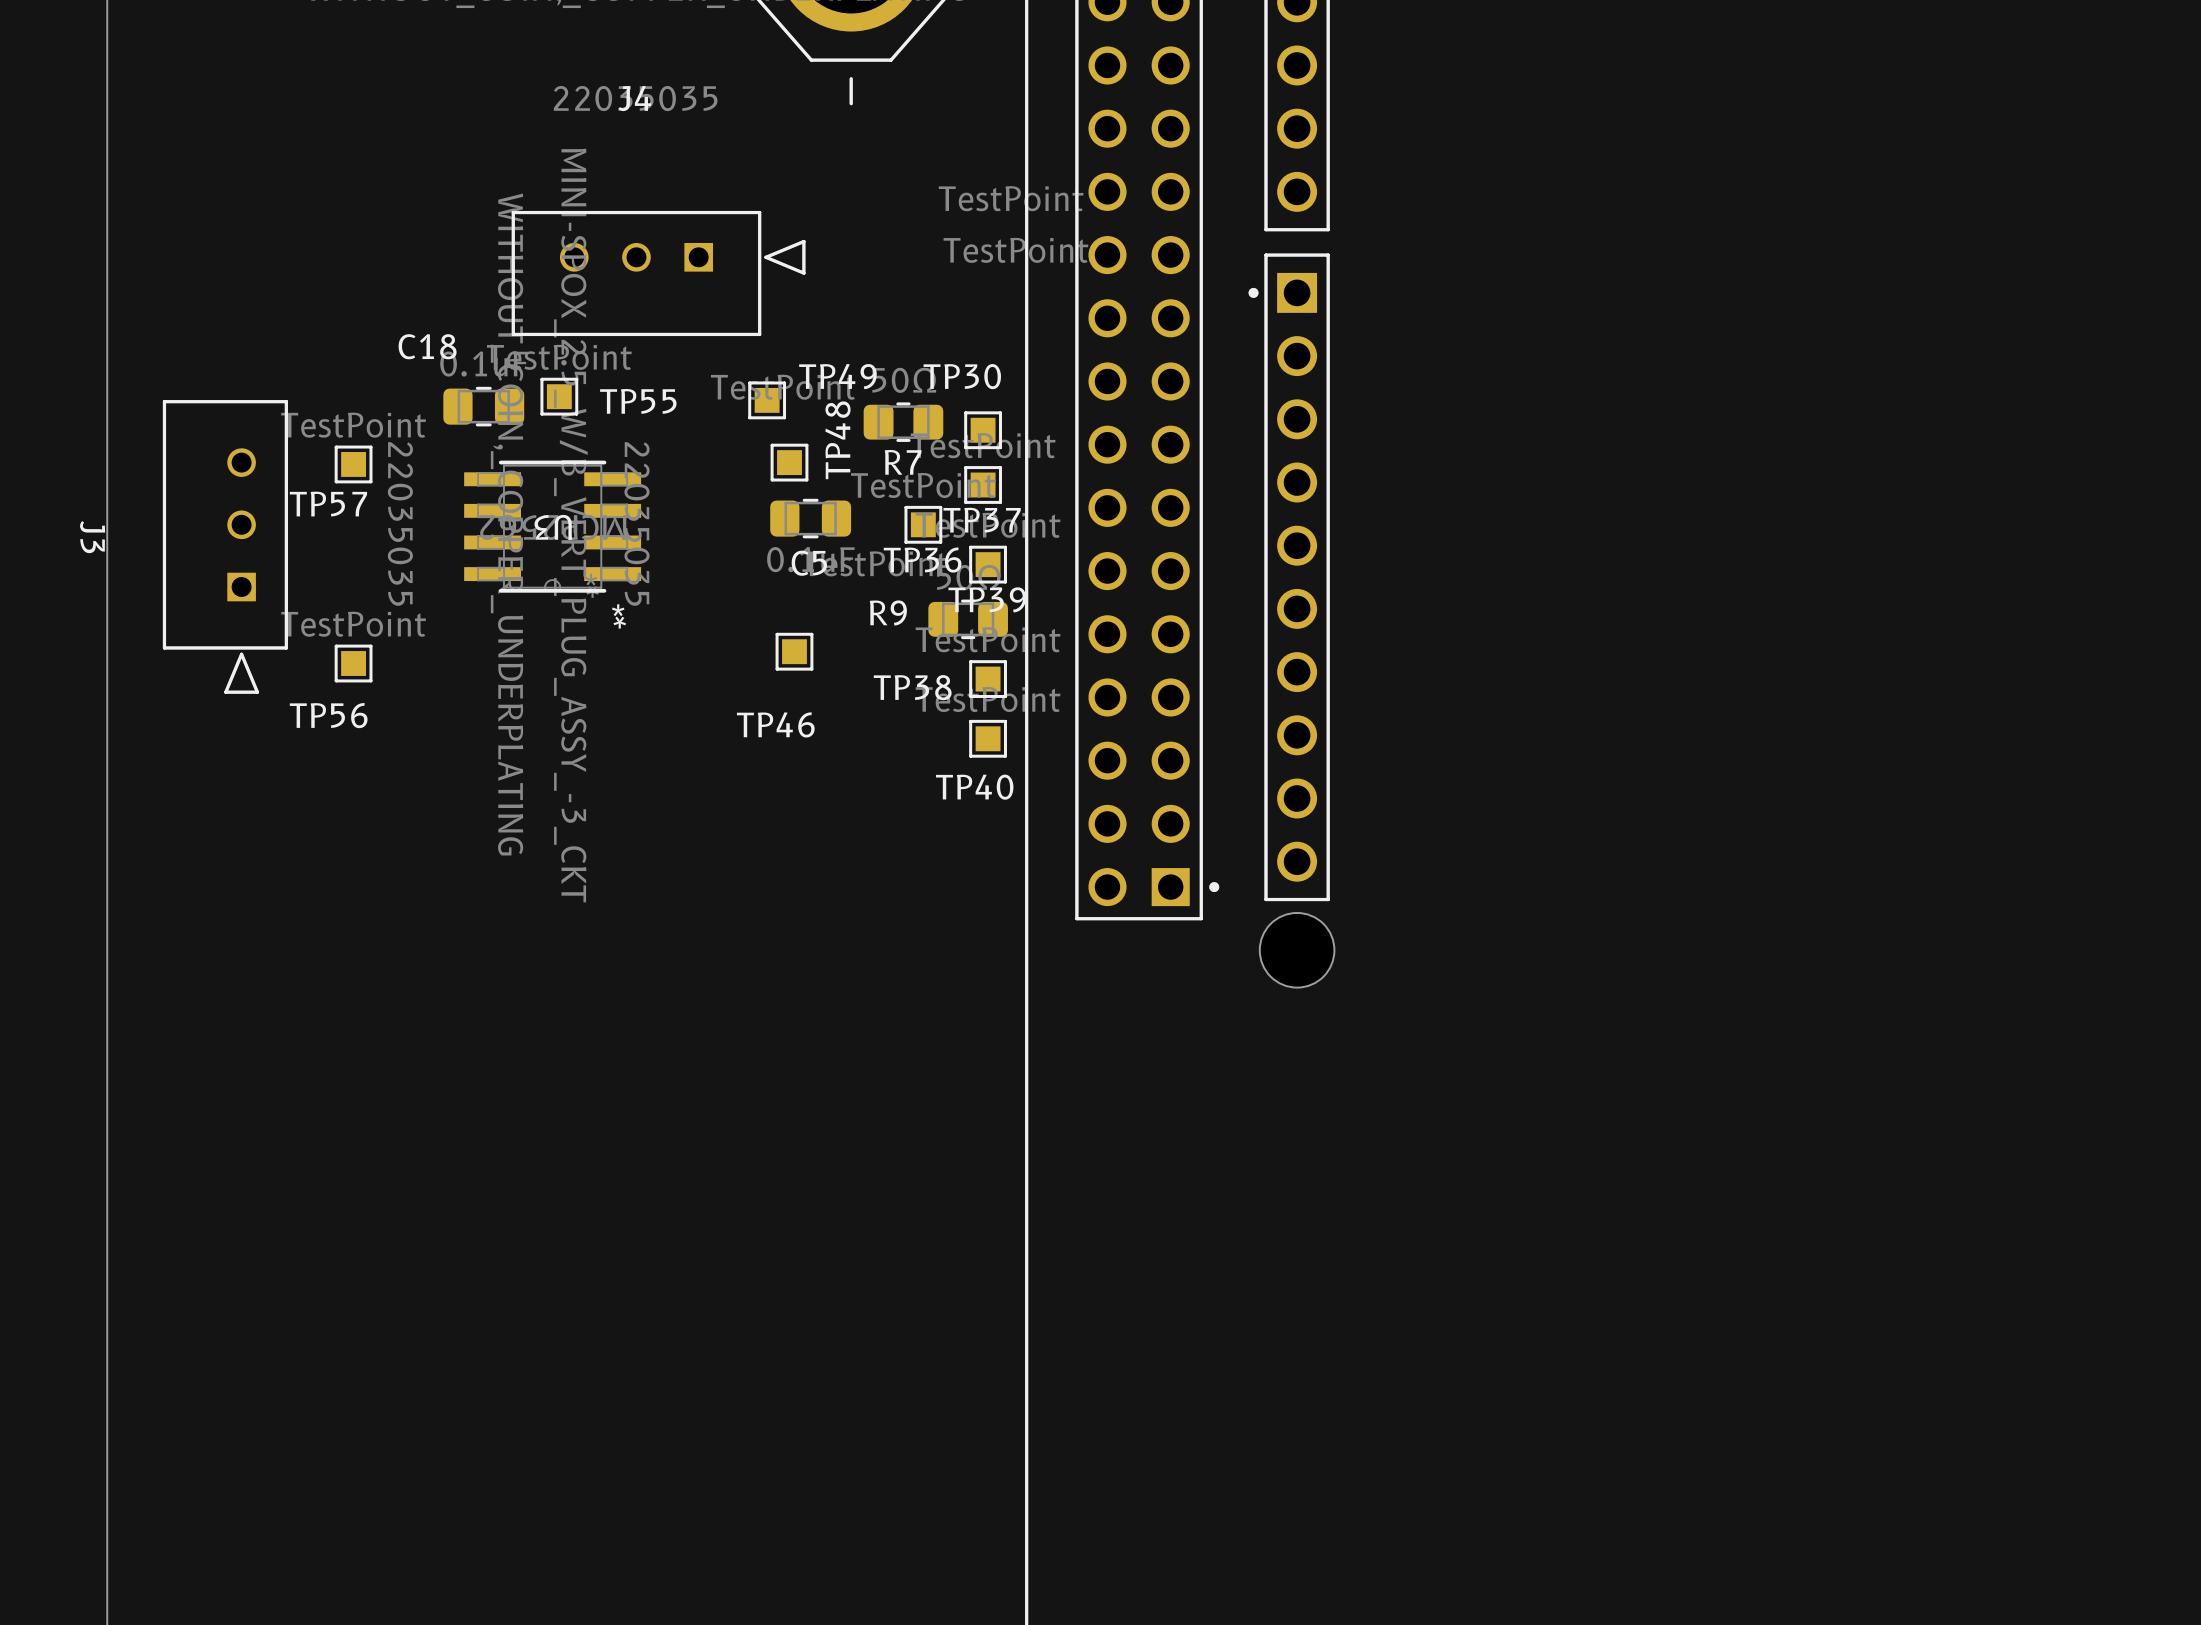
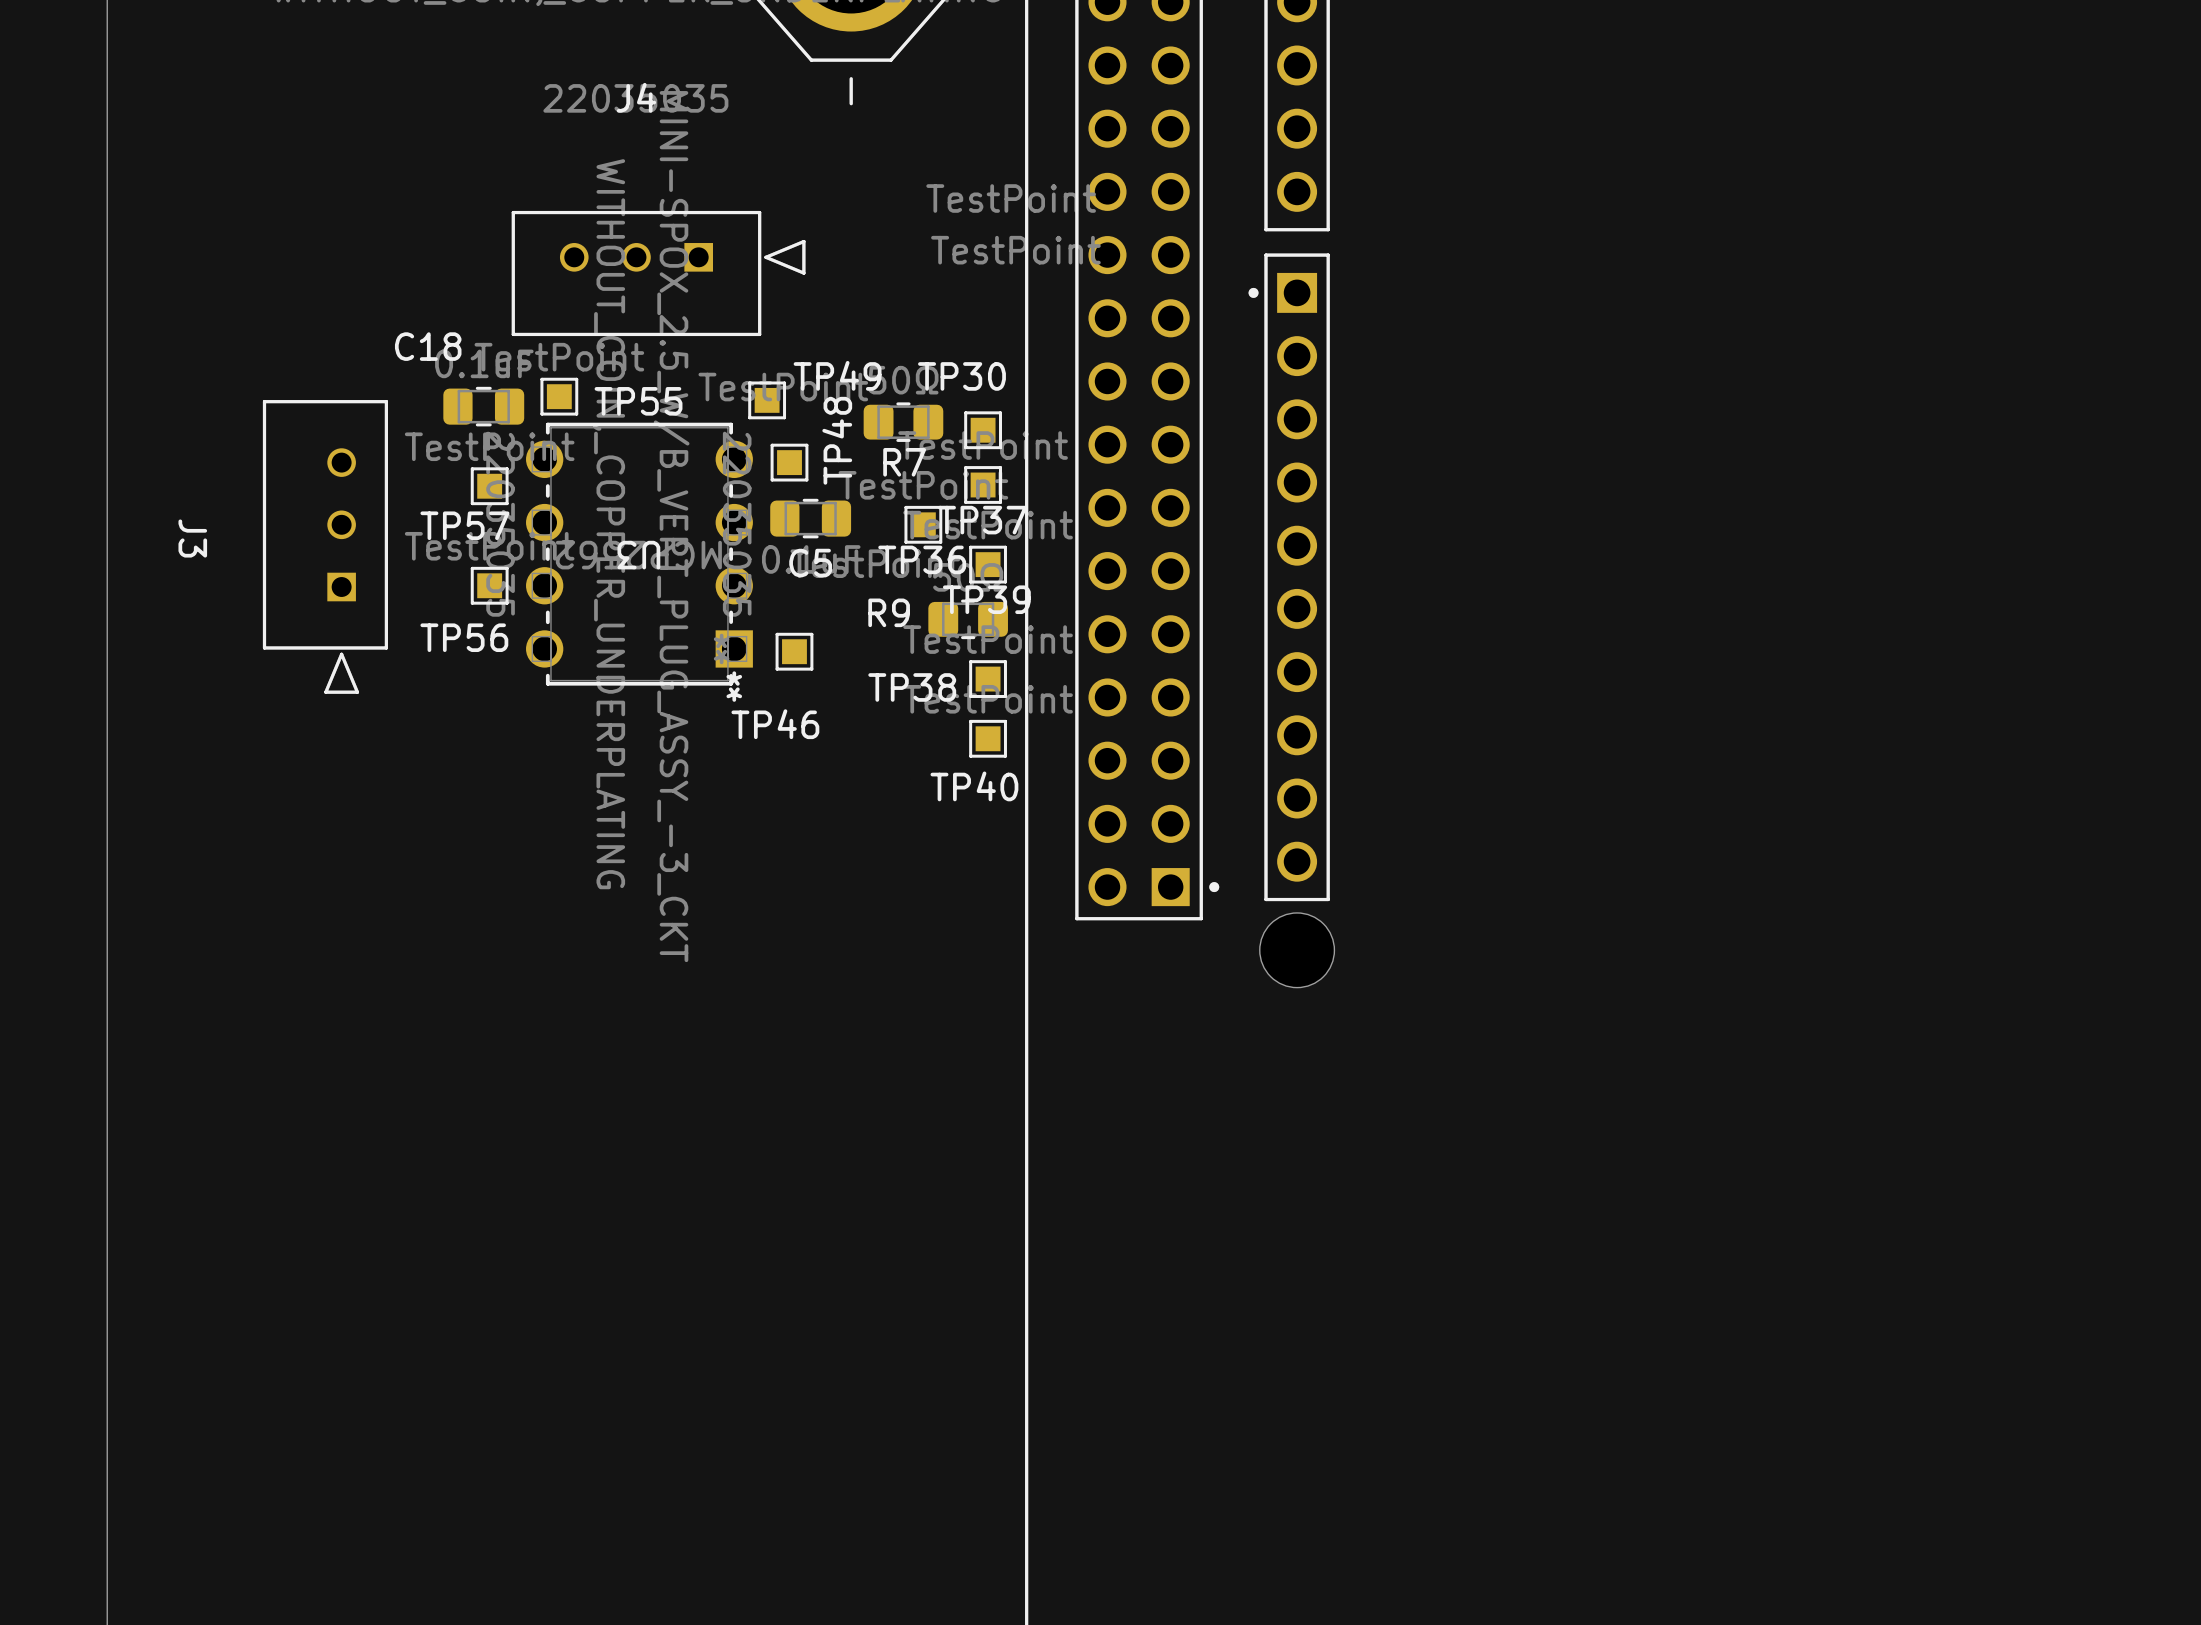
U3 footprint: [464, 460, 642, 593] -> [526, 422, 753, 686]
TP57 position: (353, 464) -> (489, 486)
J3 position: (225, 546) -> (325, 546)
TP56 position: (353, 663) -> (489, 585)

